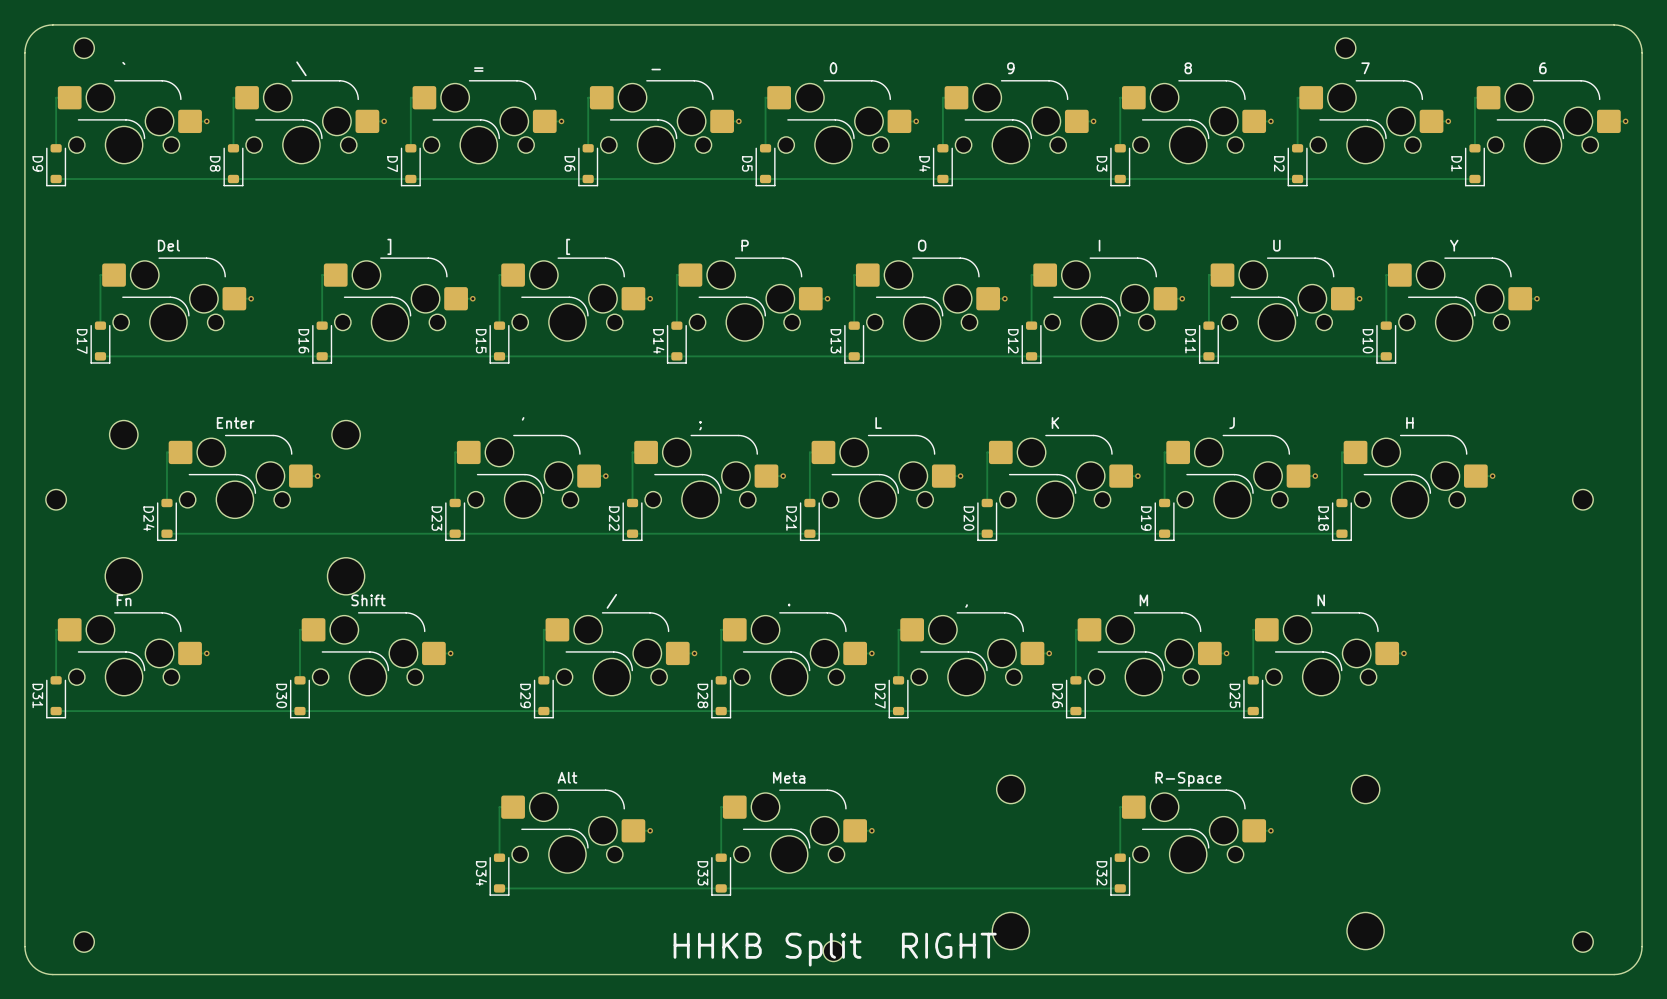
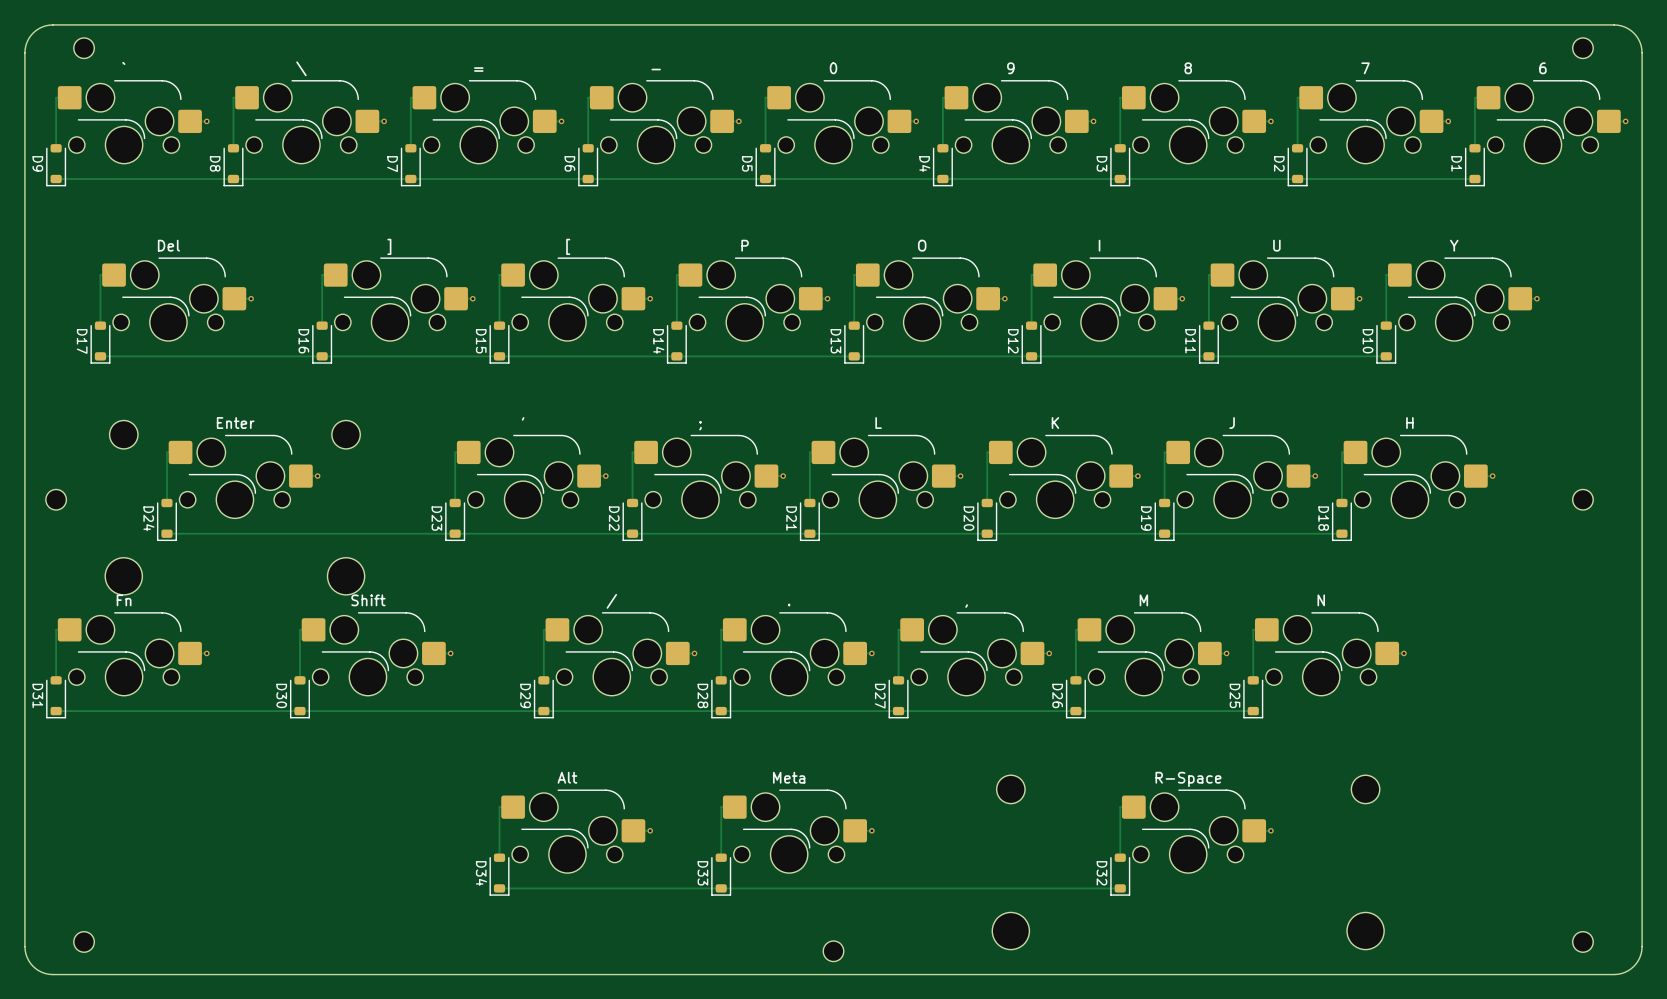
part: (1345, 48) -> none
part: none -> (1582, 48)
text: HHKB Split RIGHT (835, 949) -> none

